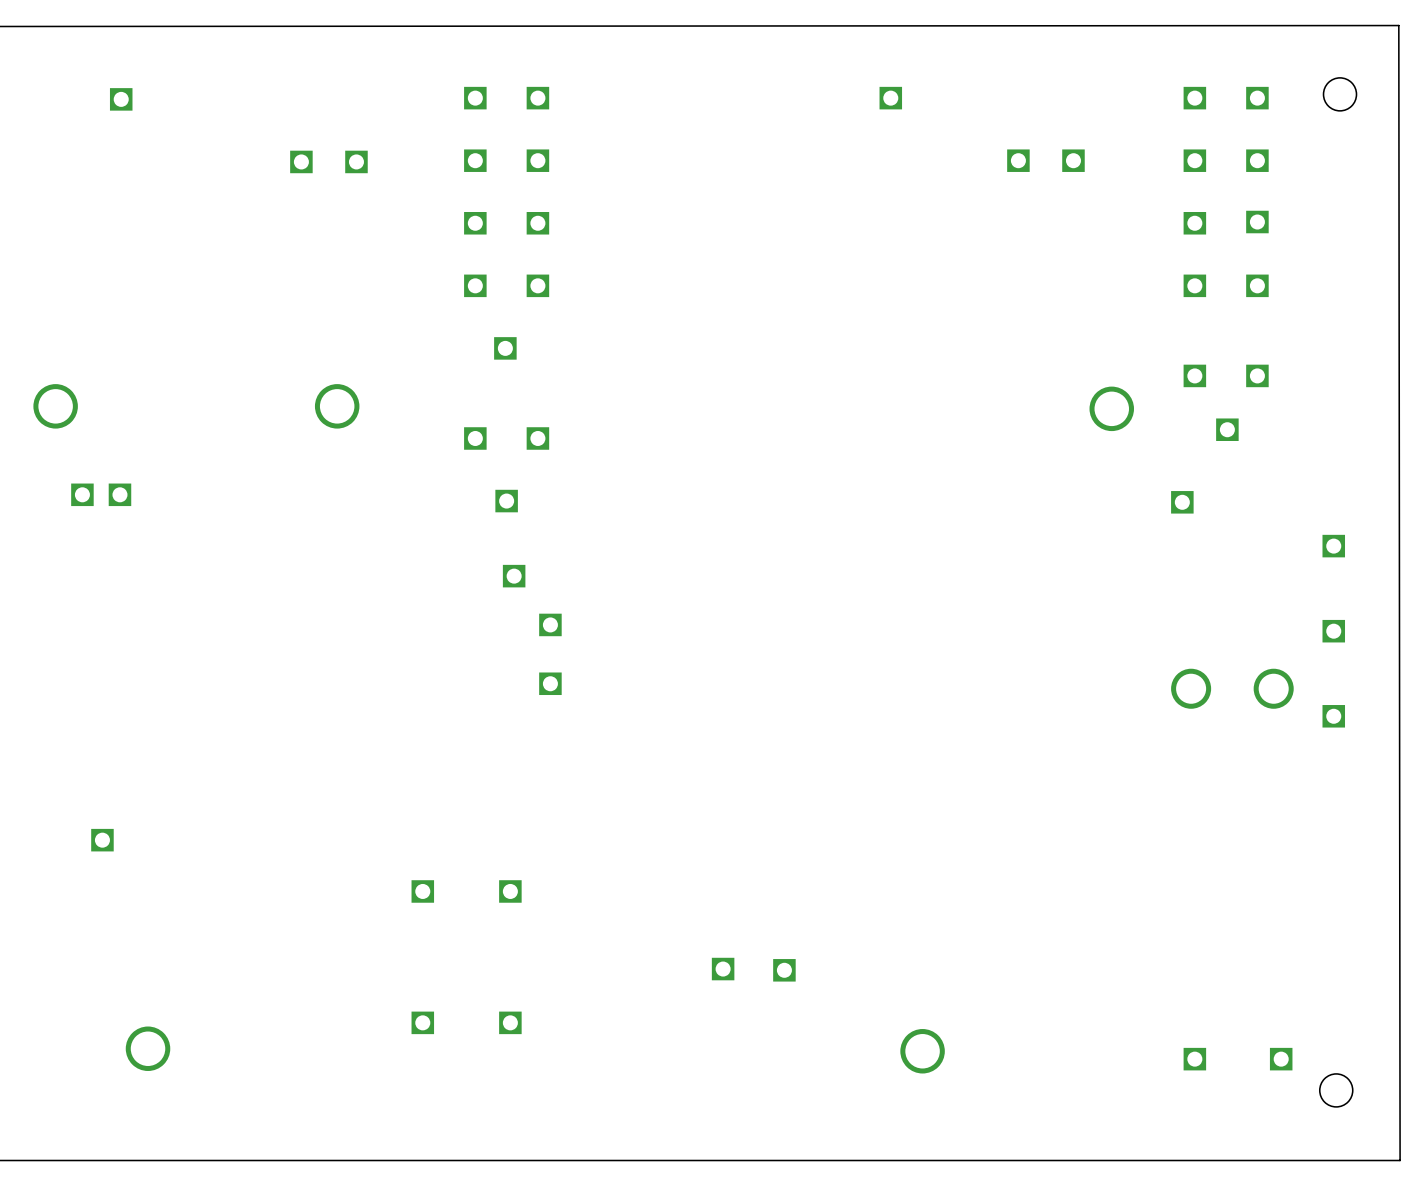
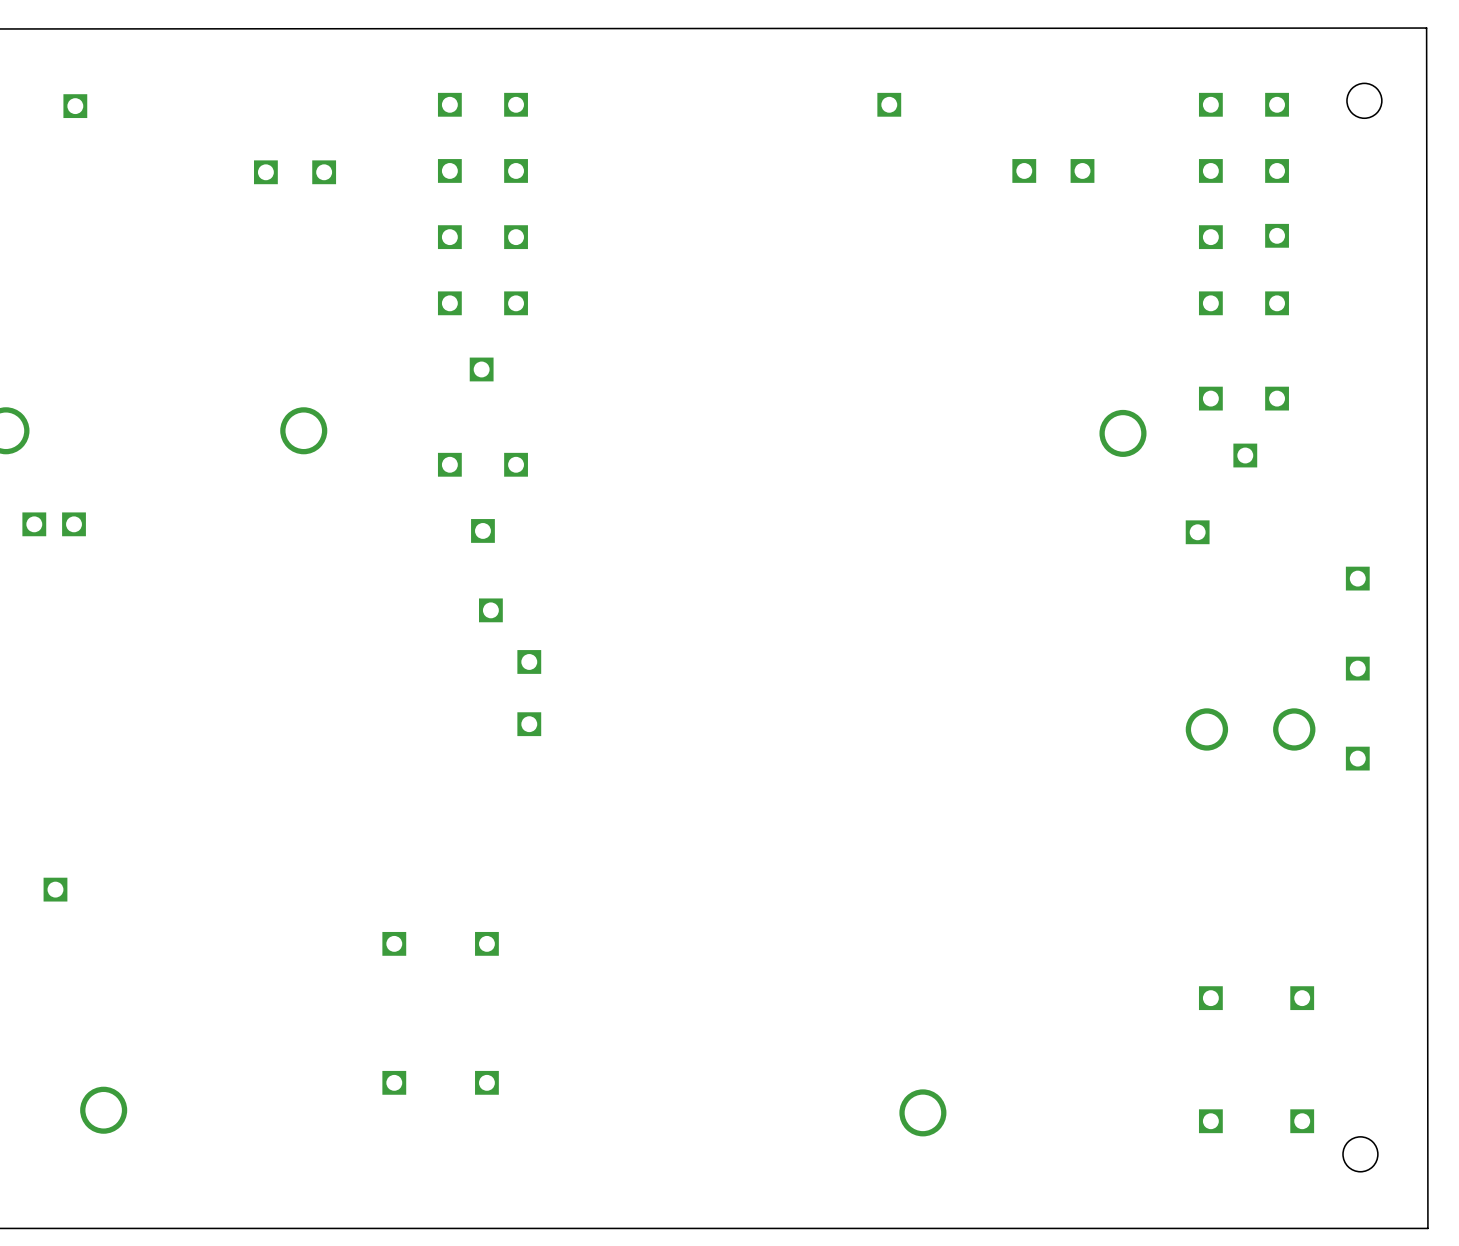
part: none -> (1210, 998)
part: none -> (1302, 998)
part: (723, 969) -> none
part: (784, 970) -> none

